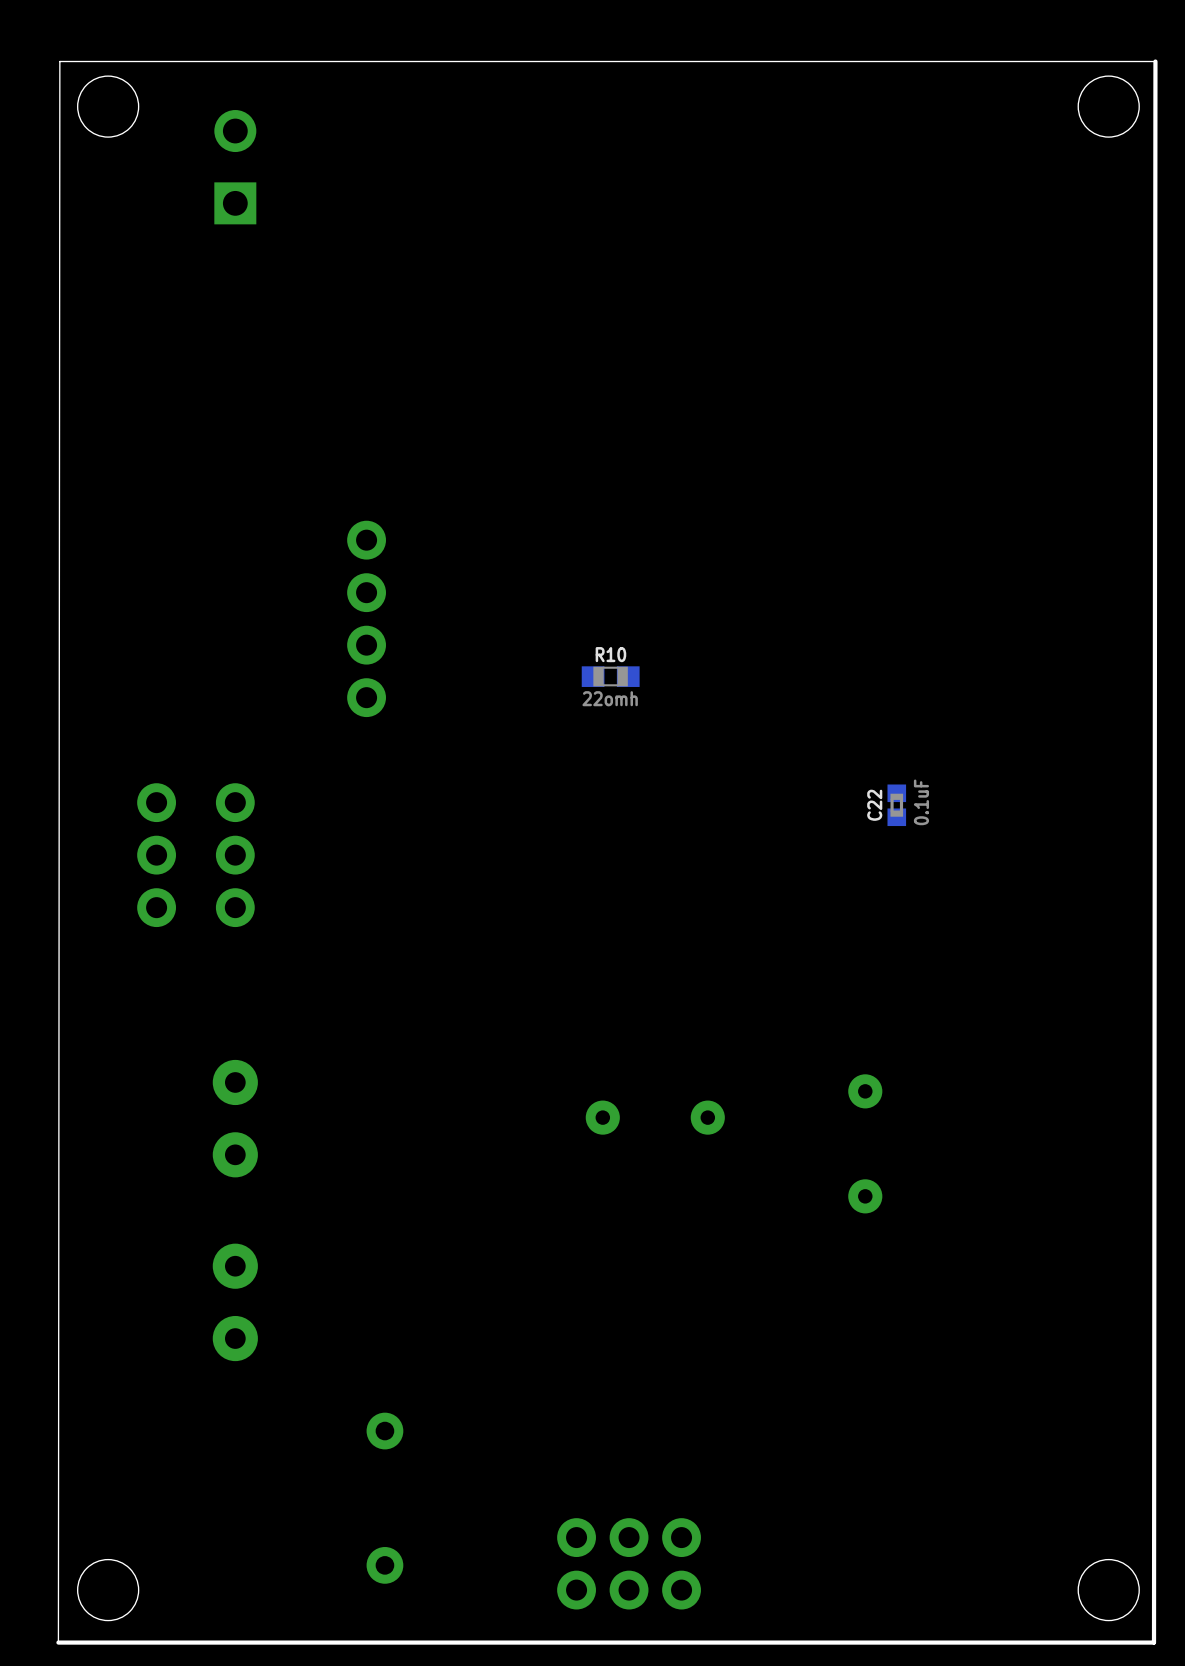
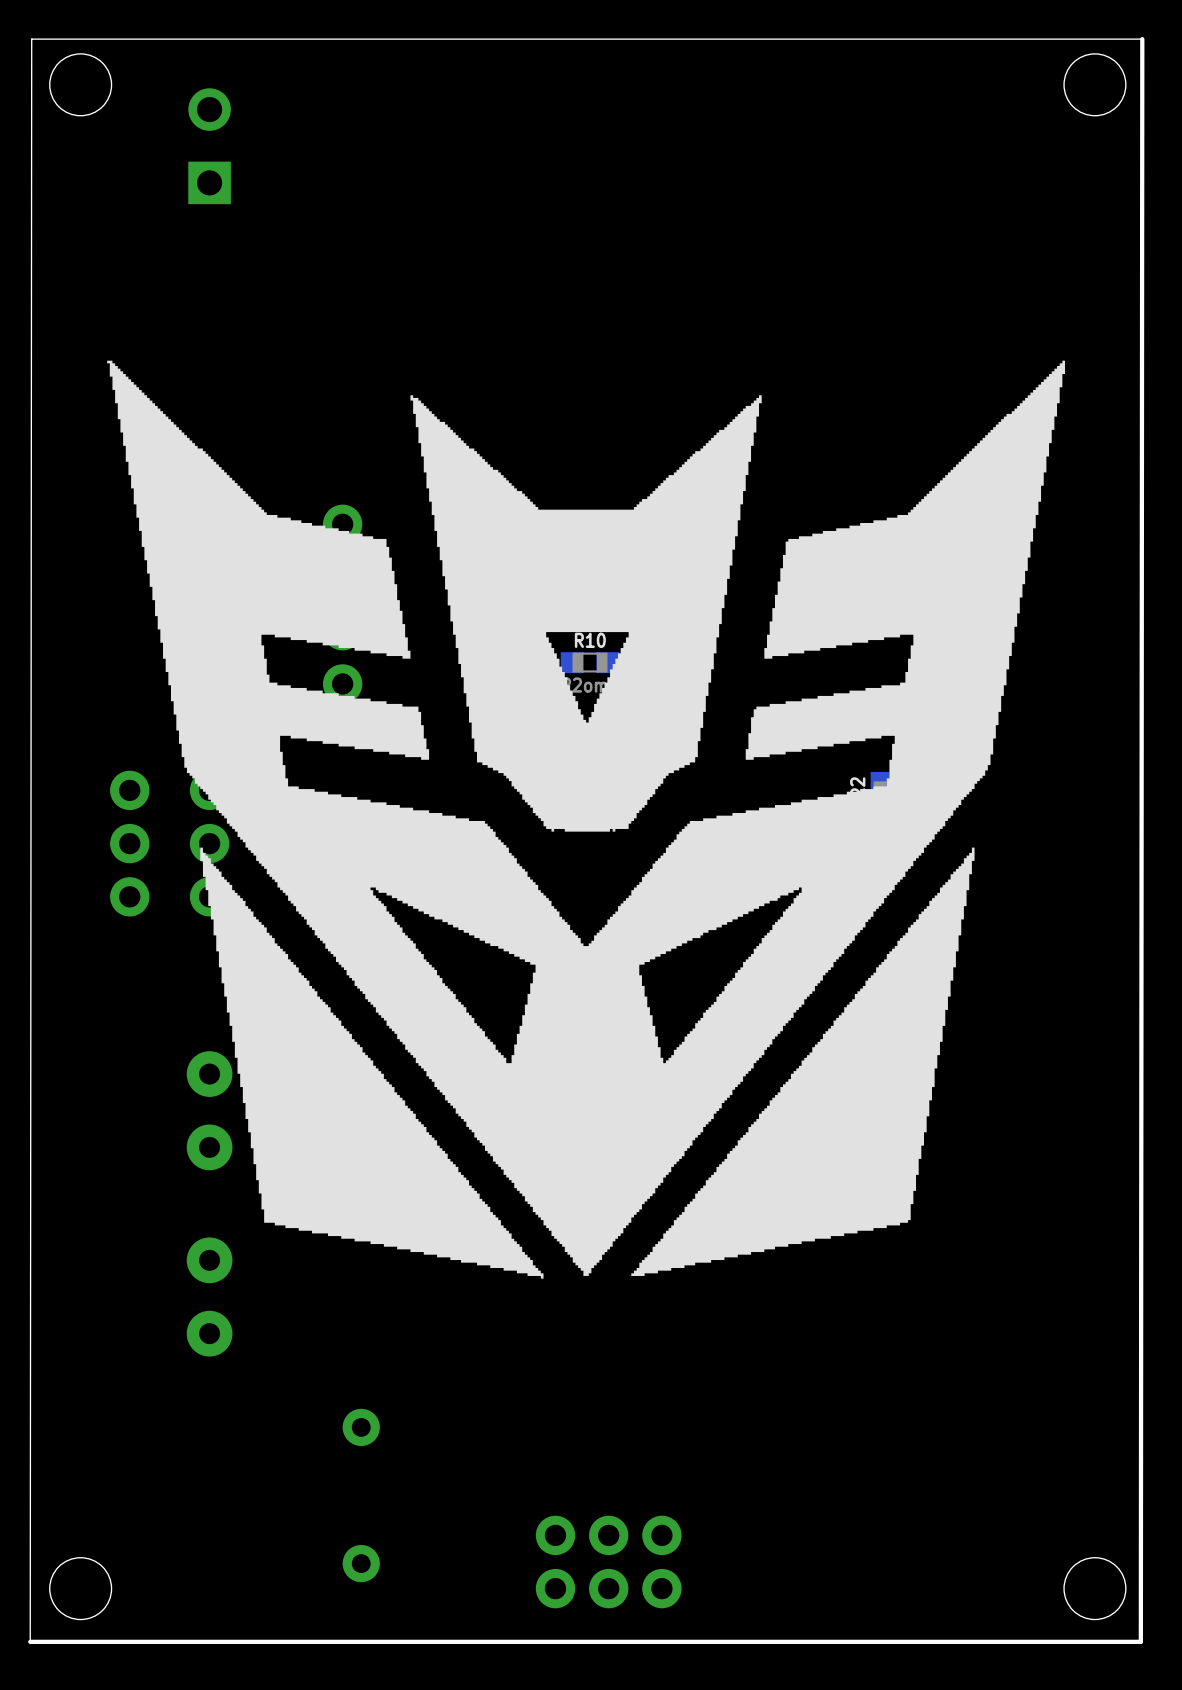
drawing: none -> [107, 360, 1066, 1276]
drawing: none -> [410, 395, 762, 832]
drawing: none -> [200, 847, 544, 1279]
drawing: none -> [631, 847, 975, 1276]

